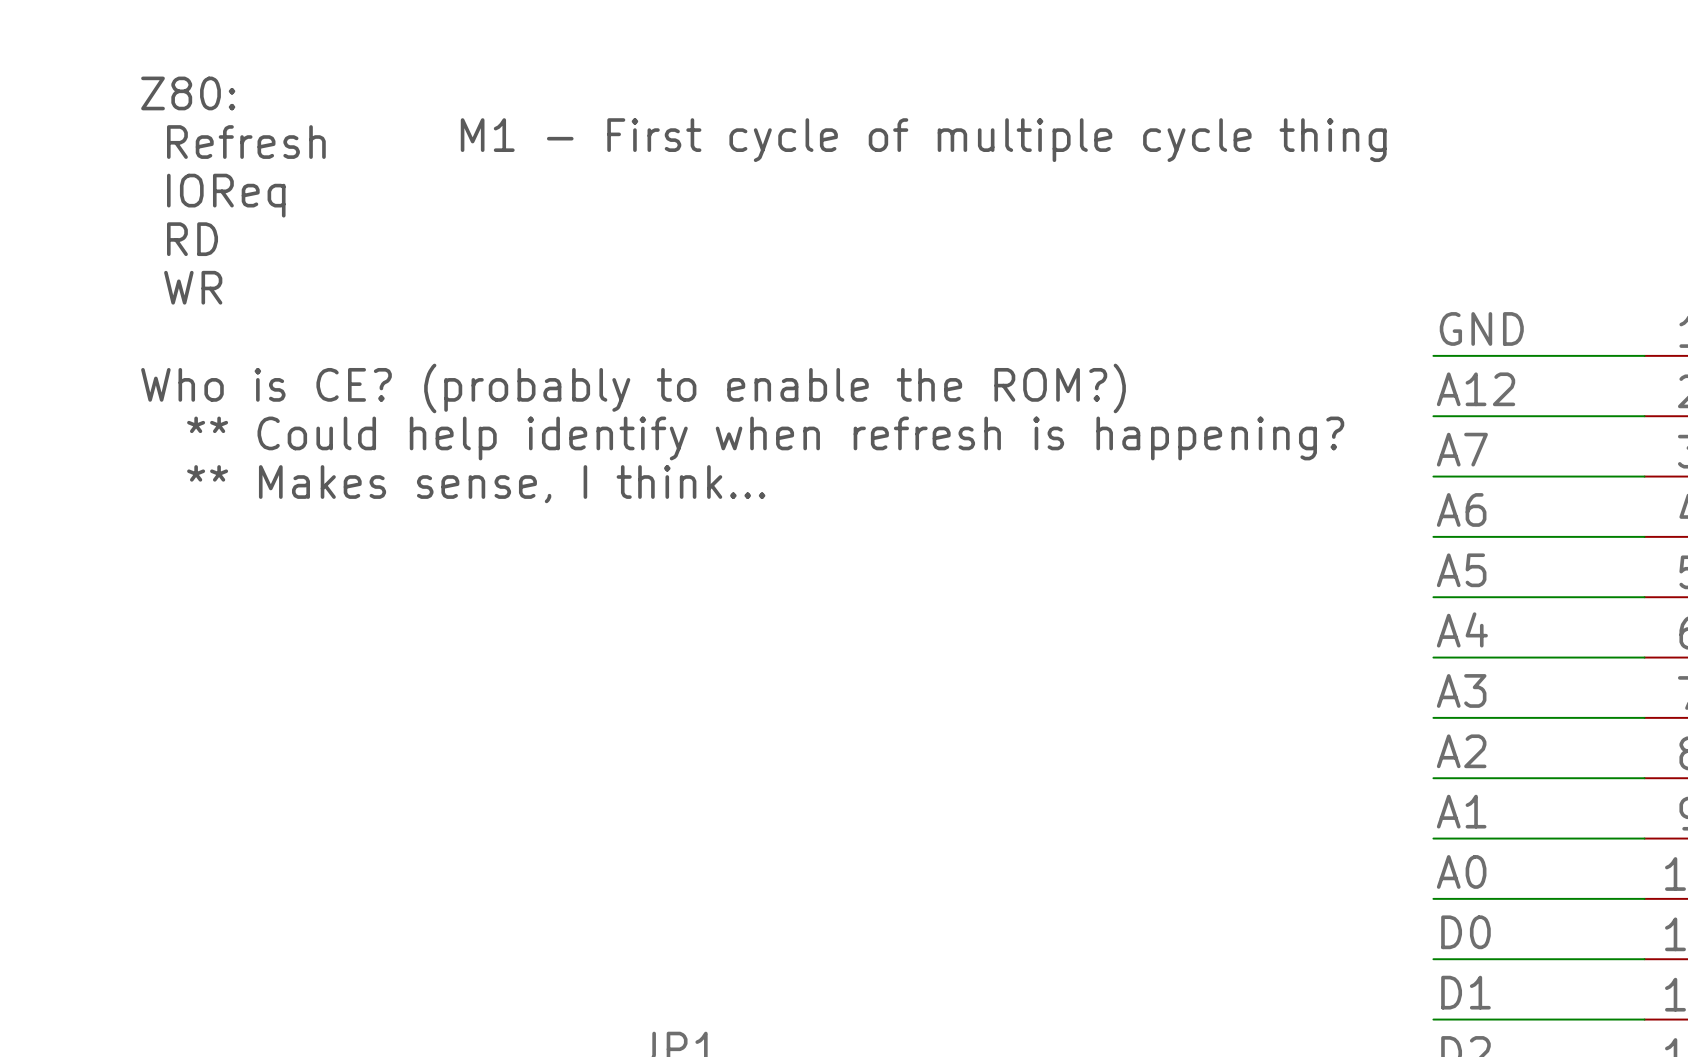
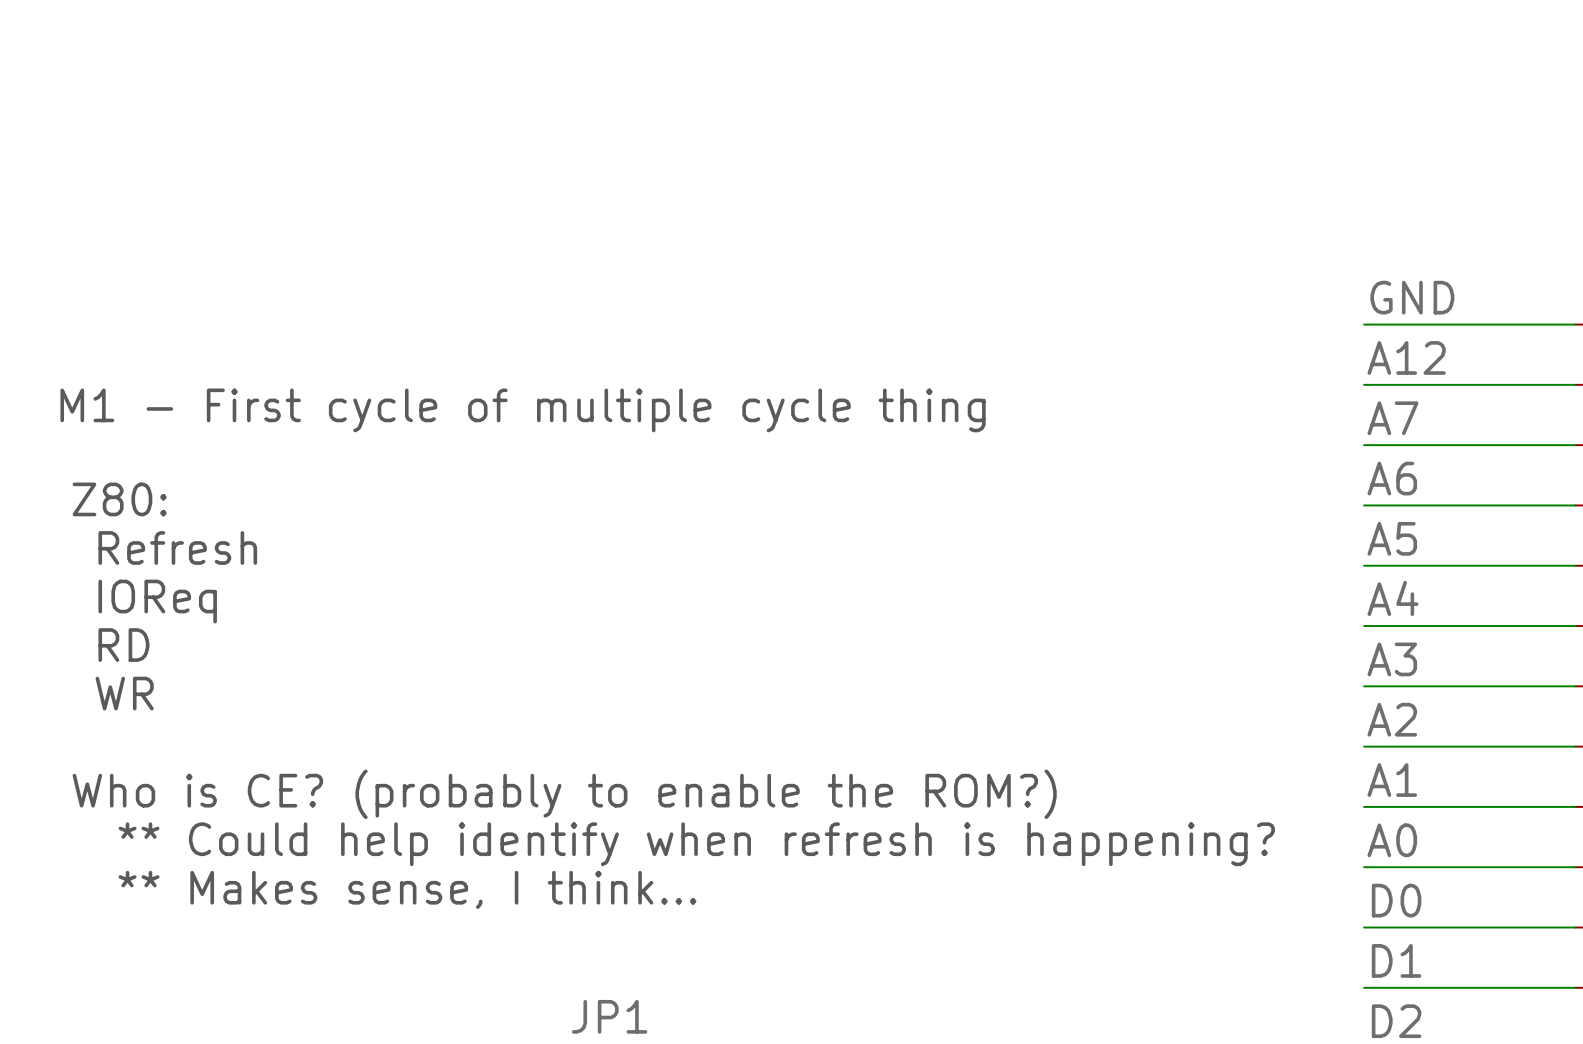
text position: Z80: (188, 93) -> Z80: (119, 499)
text position: M1 - First cycle of multiple cycle thing (923, 140) -> M1 - First cycle of multiple cycle thing (523, 410)
text position: Refresh (246, 142) -> Refresh (177, 547)
text position: IOReq (226, 195) -> IOReq (157, 601)
text position: RD (192, 239) -> RD (123, 645)
text position: WR (193, 287) -> WR (124, 693)
text position: Who is CE? (probably to enable the ROM?) (633, 388) -> Who is CE? (probably to enable the ROM?) (564, 794)
text position: ** Could help identify when refresh is happening? (765, 438) -> ** Could help identify when refresh is happening? (696, 844)
text position: ** Makes sense, I think... (476, 484) -> ** Makes sense, I think... (407, 889)

